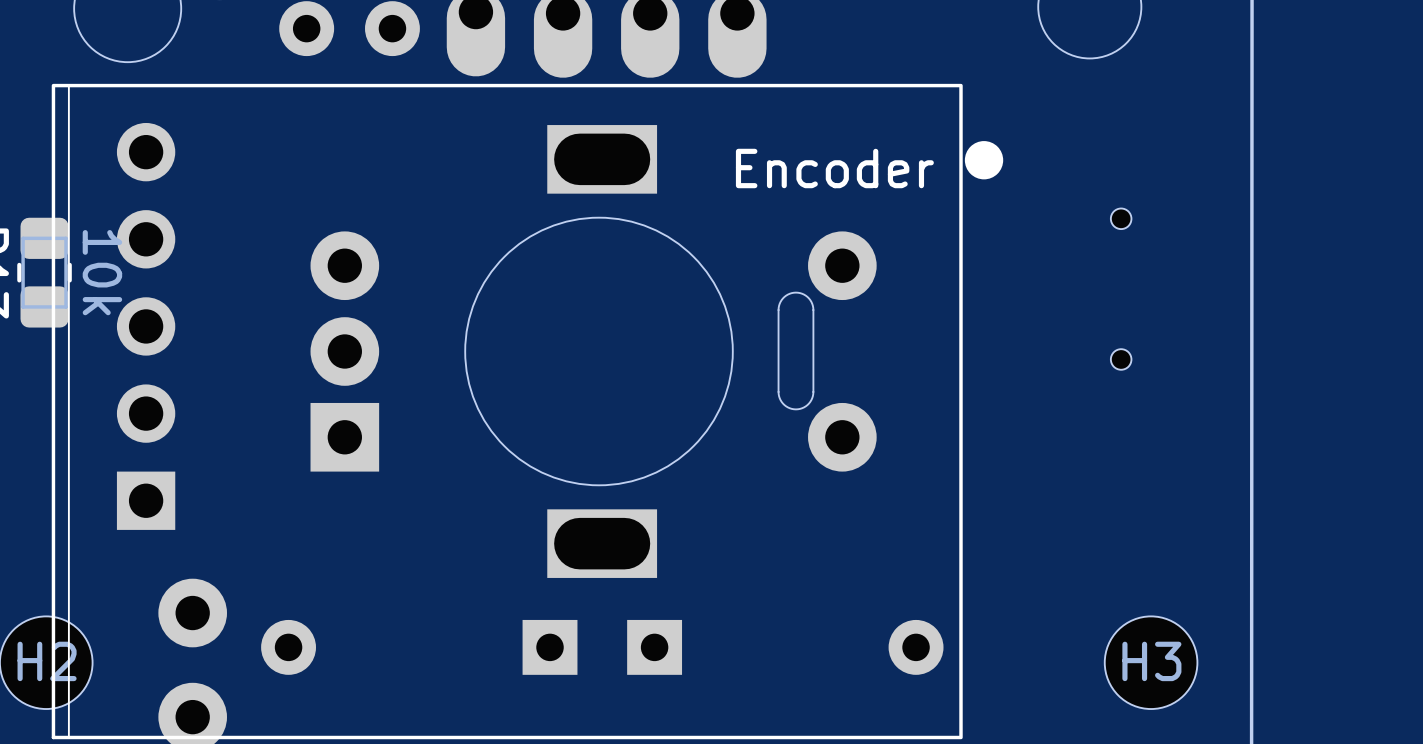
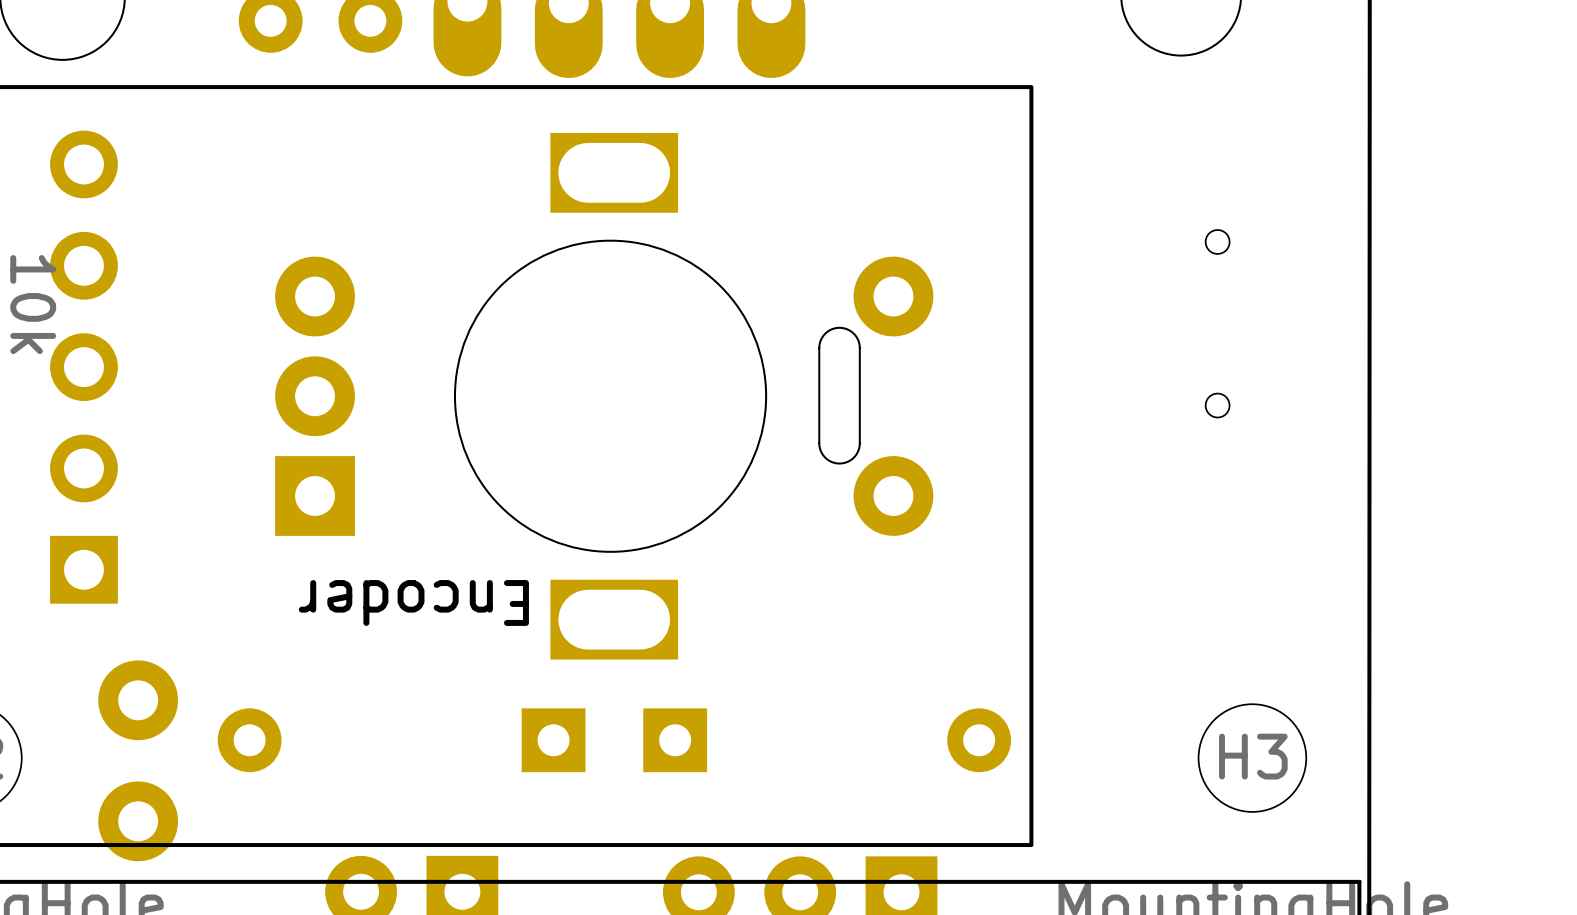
drawing: [964, 141, 1004, 180] -> none
part text rotation: 0° (834, 168) -> 180° (413, 602)
part text position: Encoder (834, 168) -> Encoder (413, 602)

